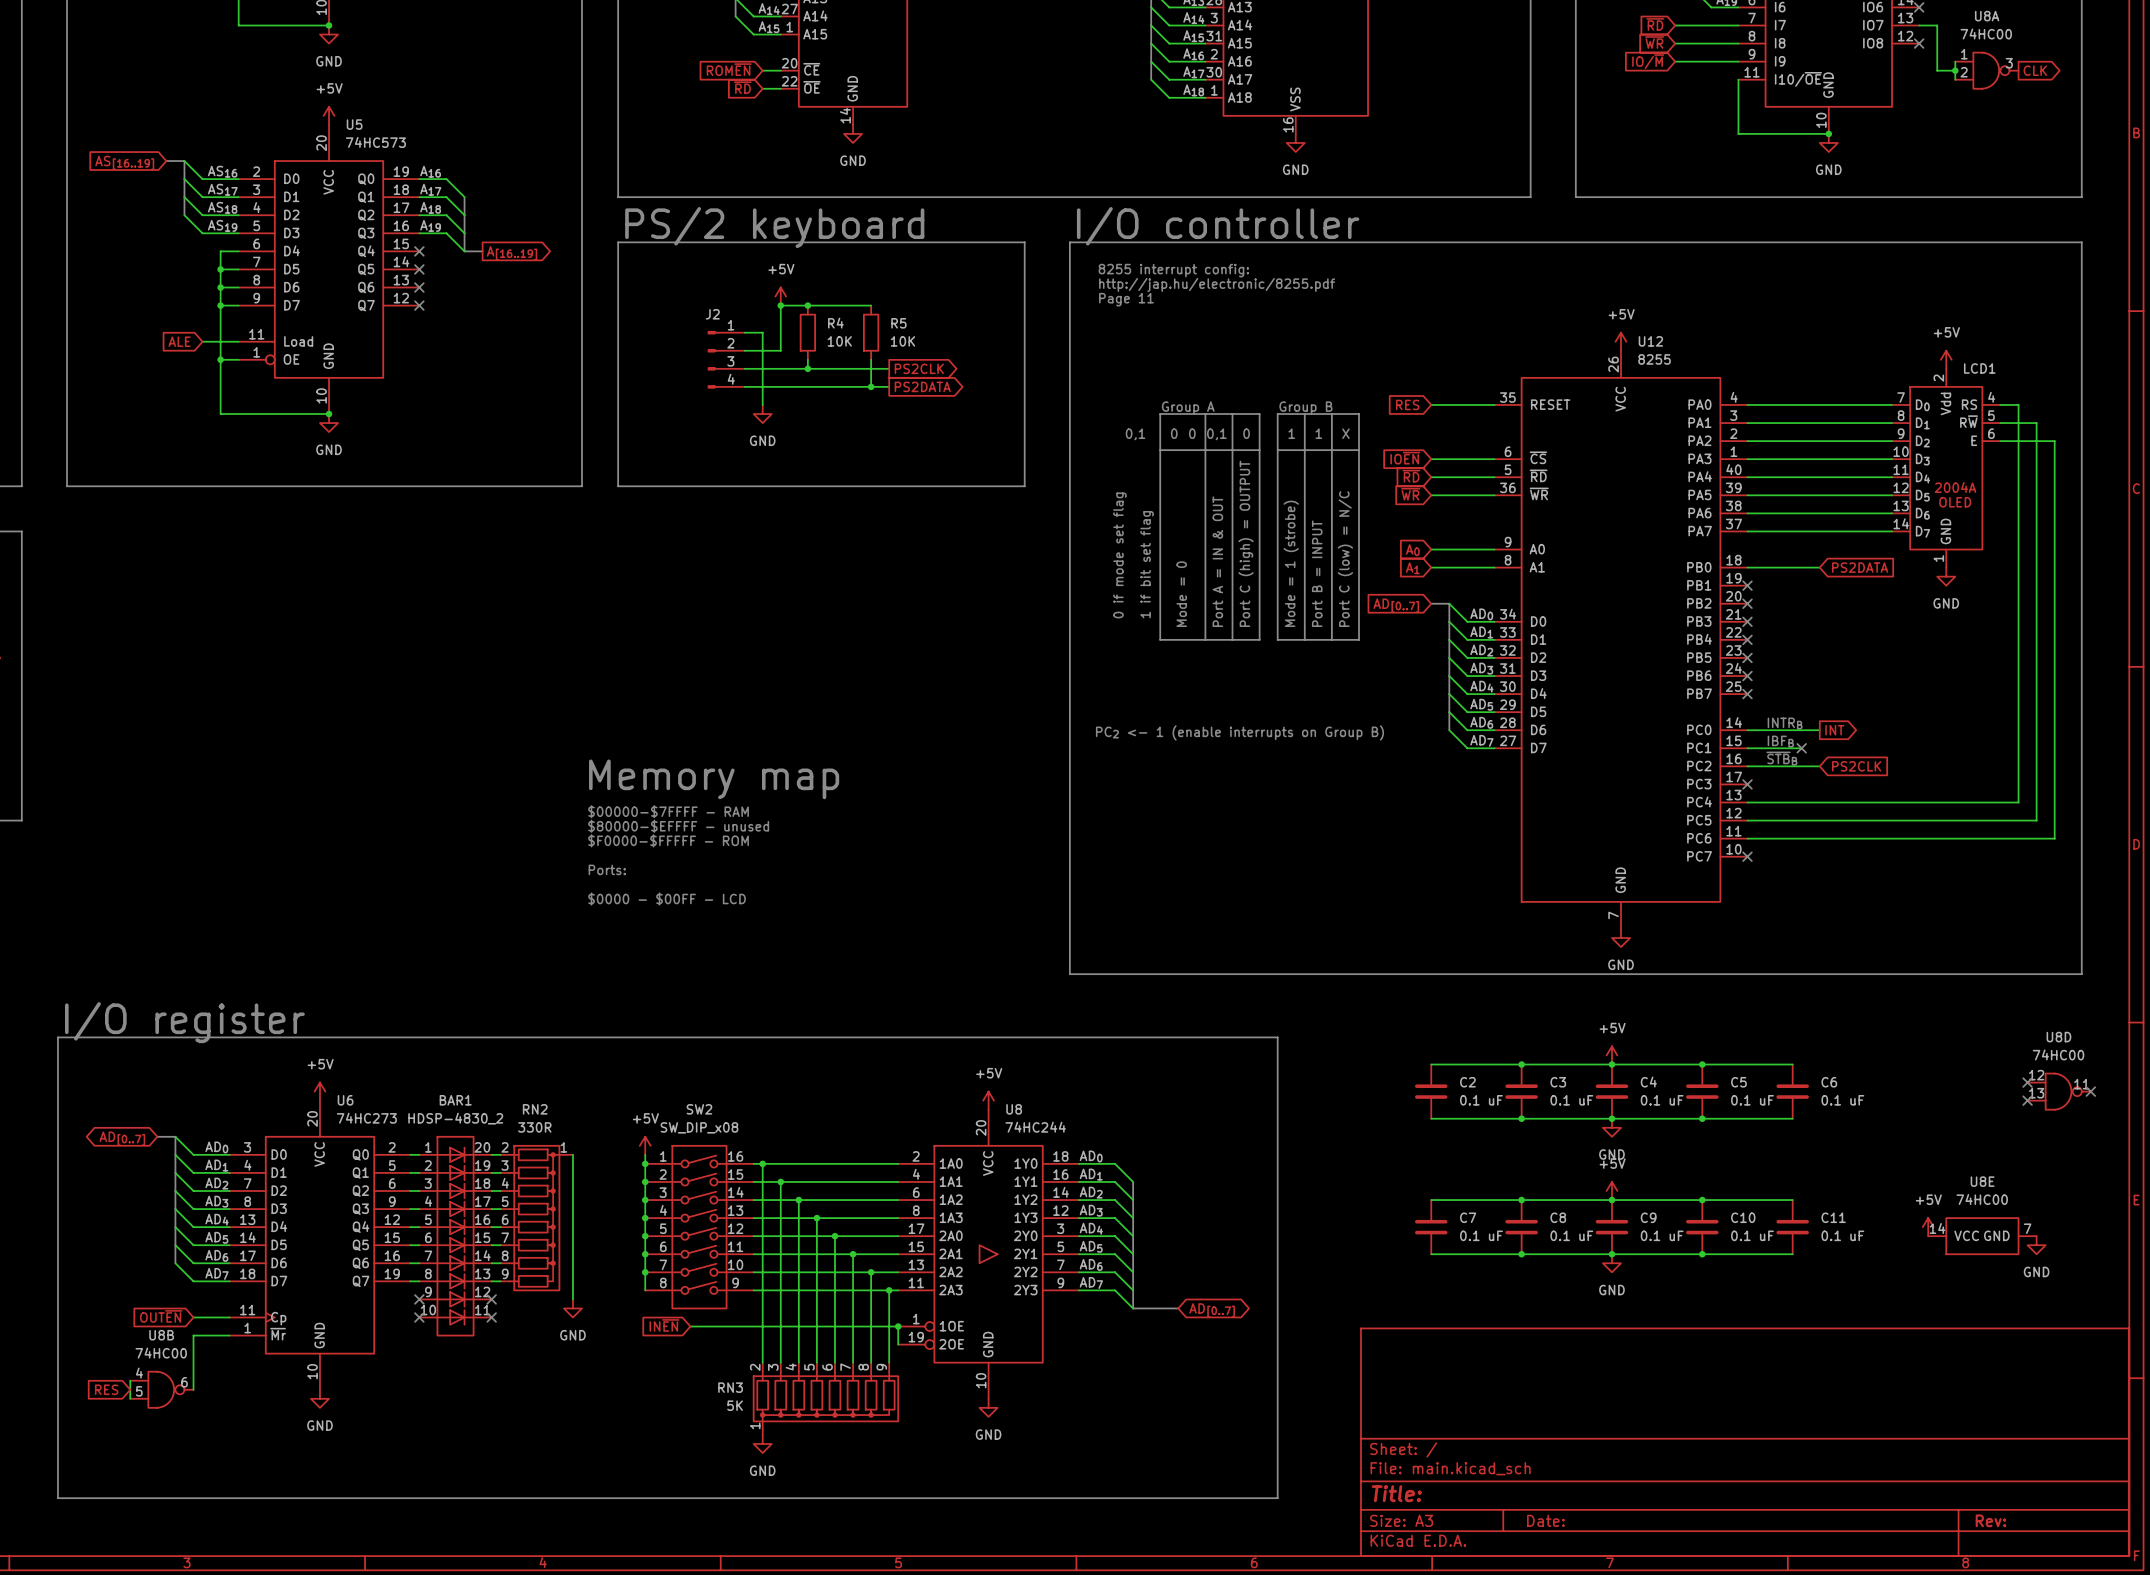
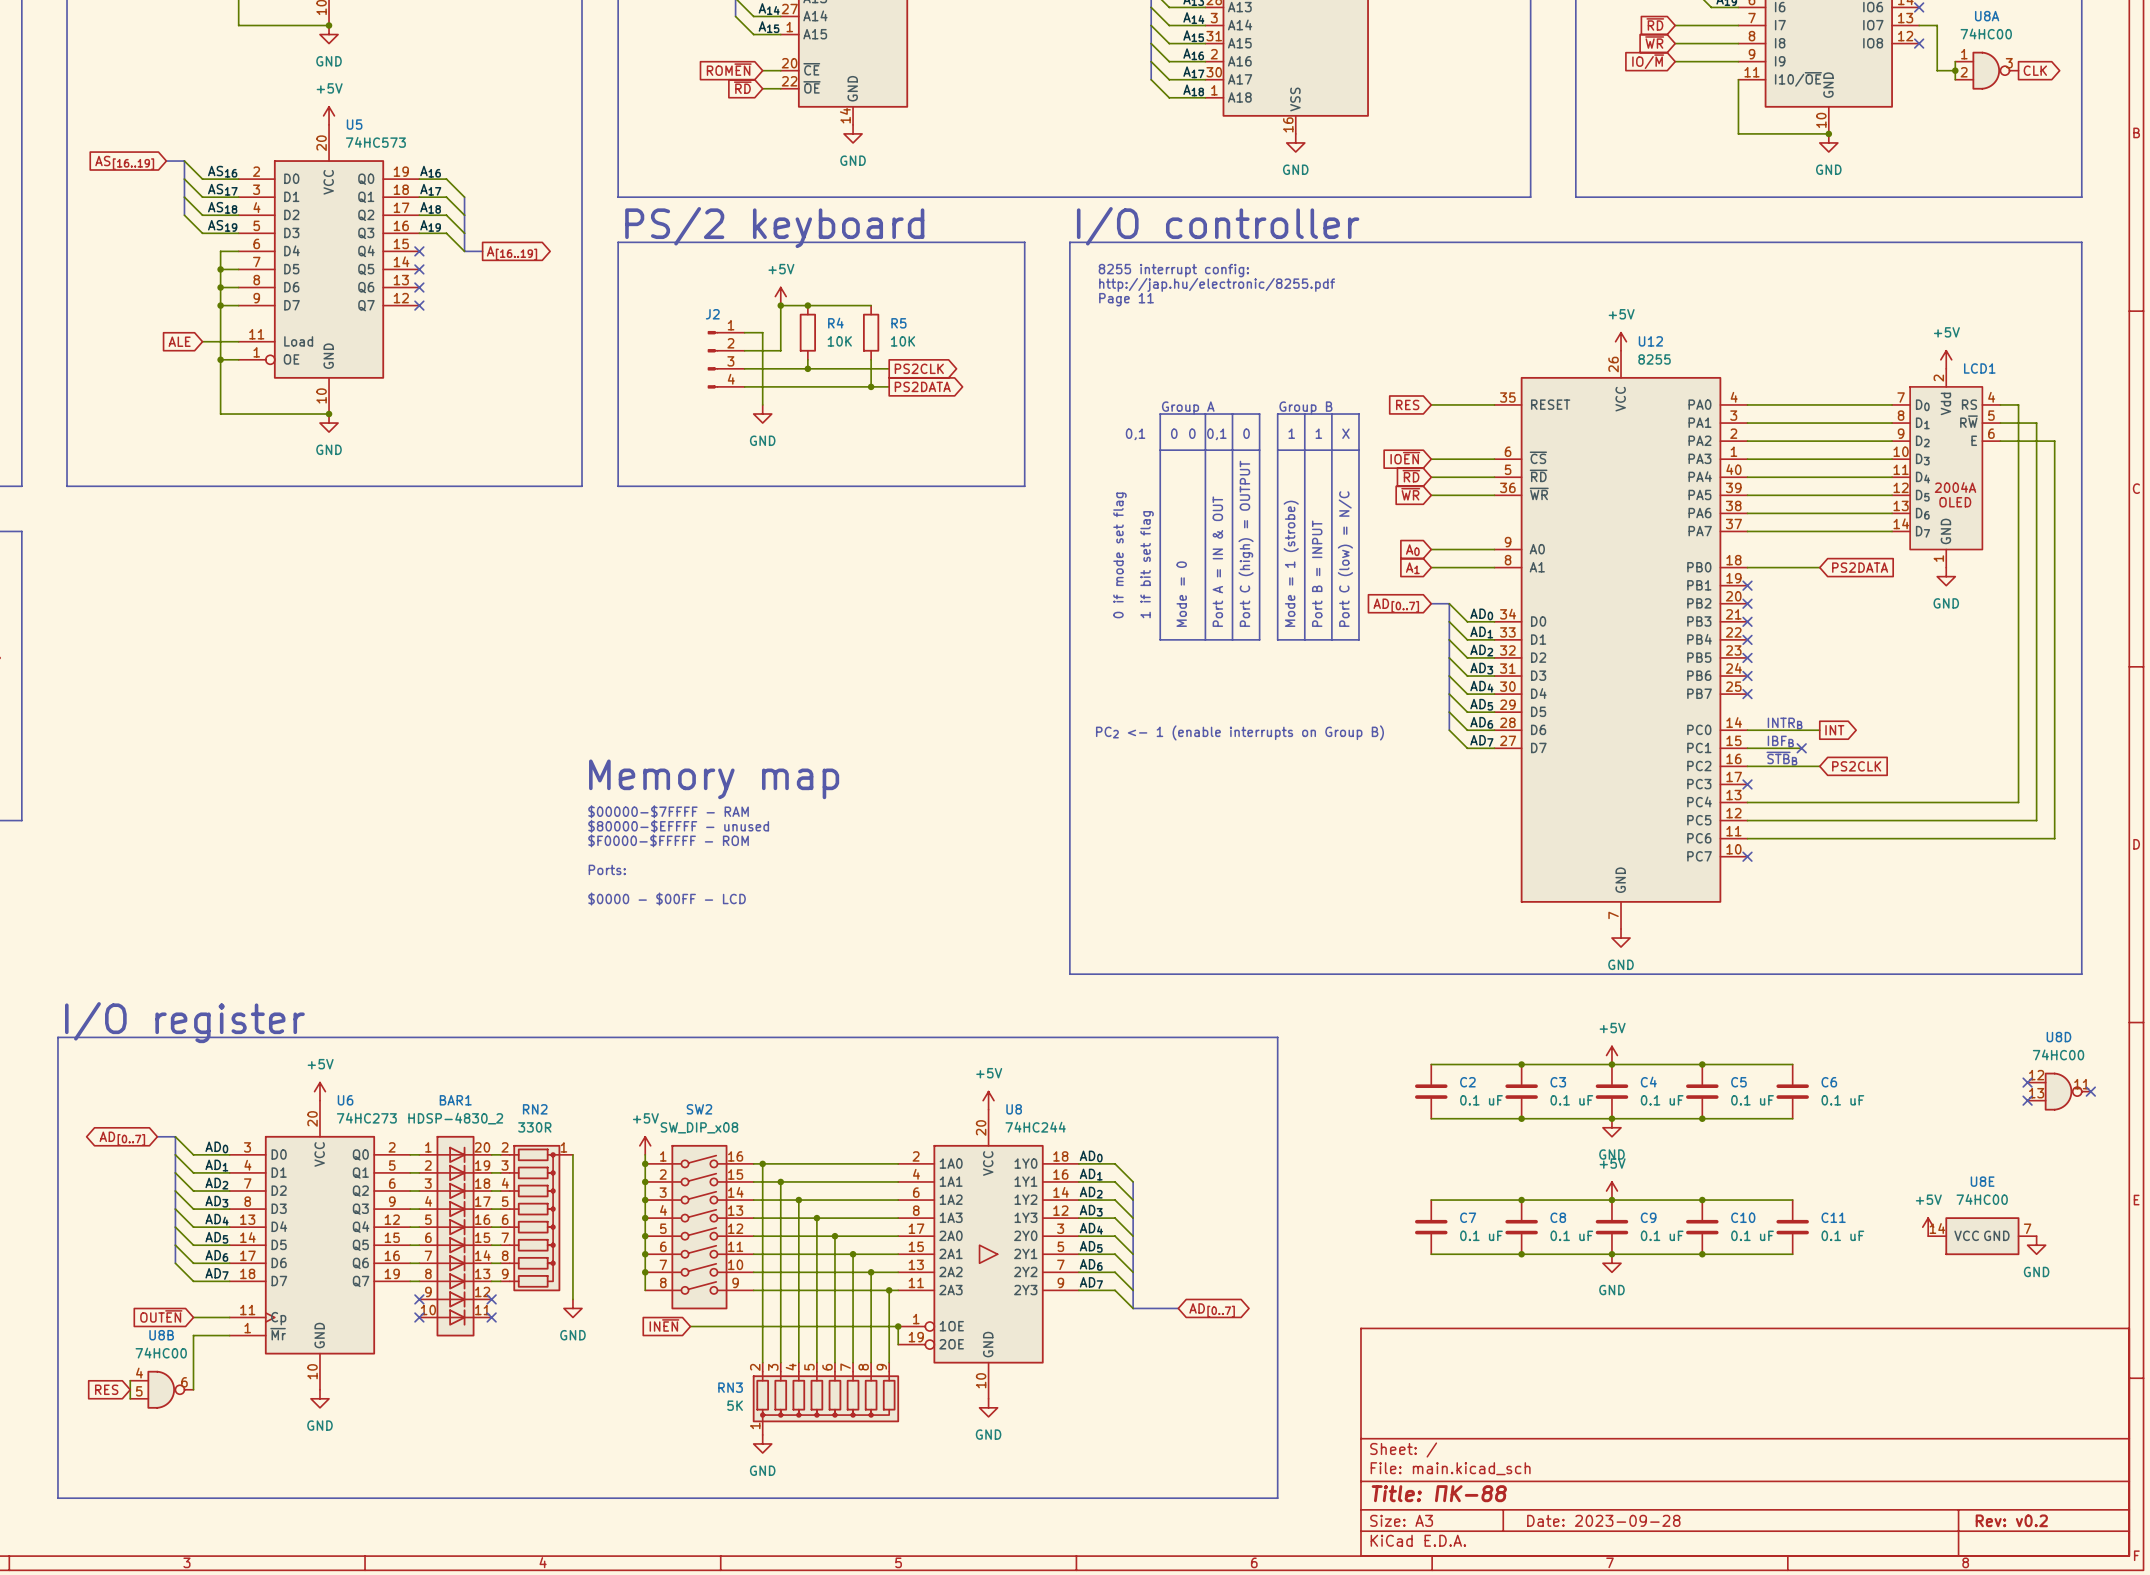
title block: Title: (1396, 1493) -> Title: ПК-88 (1439, 1493)
title block: Date: (1545, 1520) -> Date: 2023-09-28 (1603, 1520)
title block: Rev: (1990, 1520) -> Rev: v0.2 (2011, 1520)

